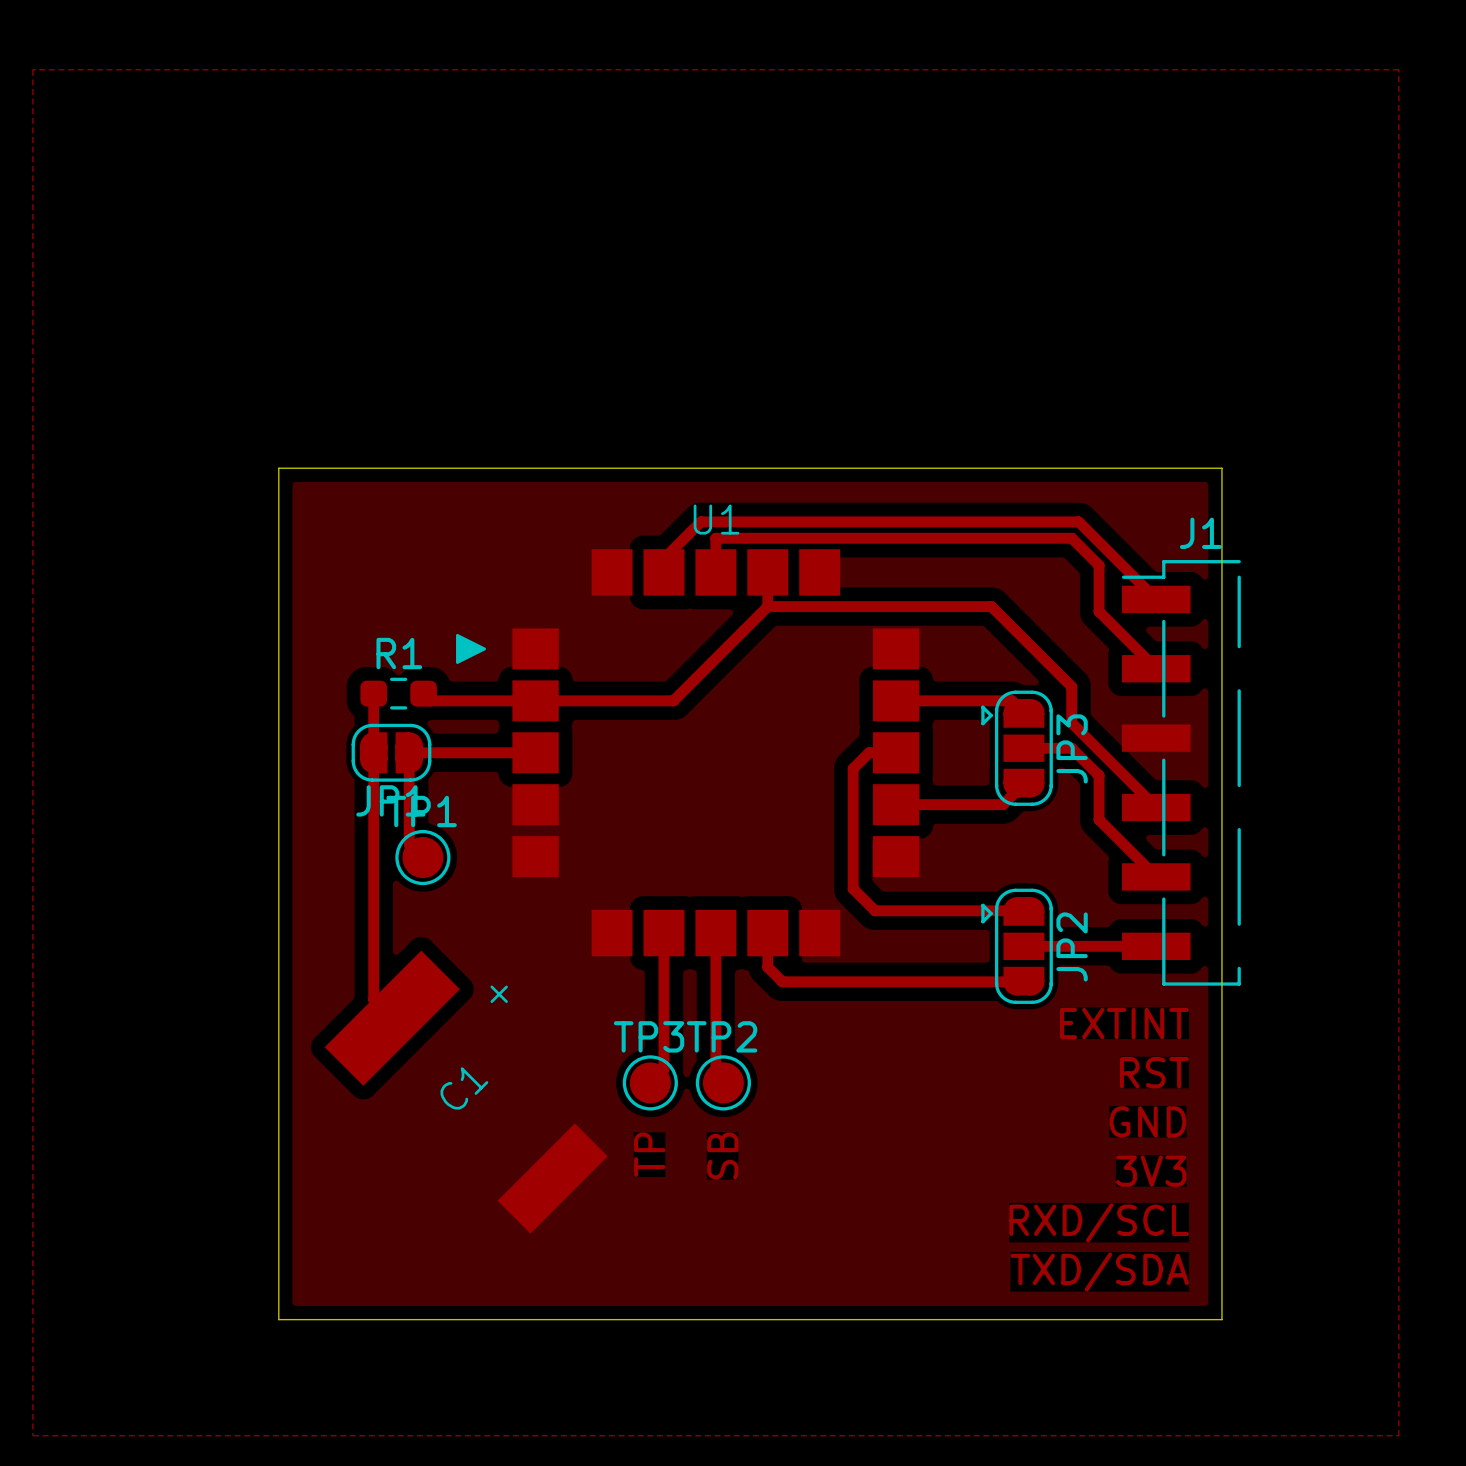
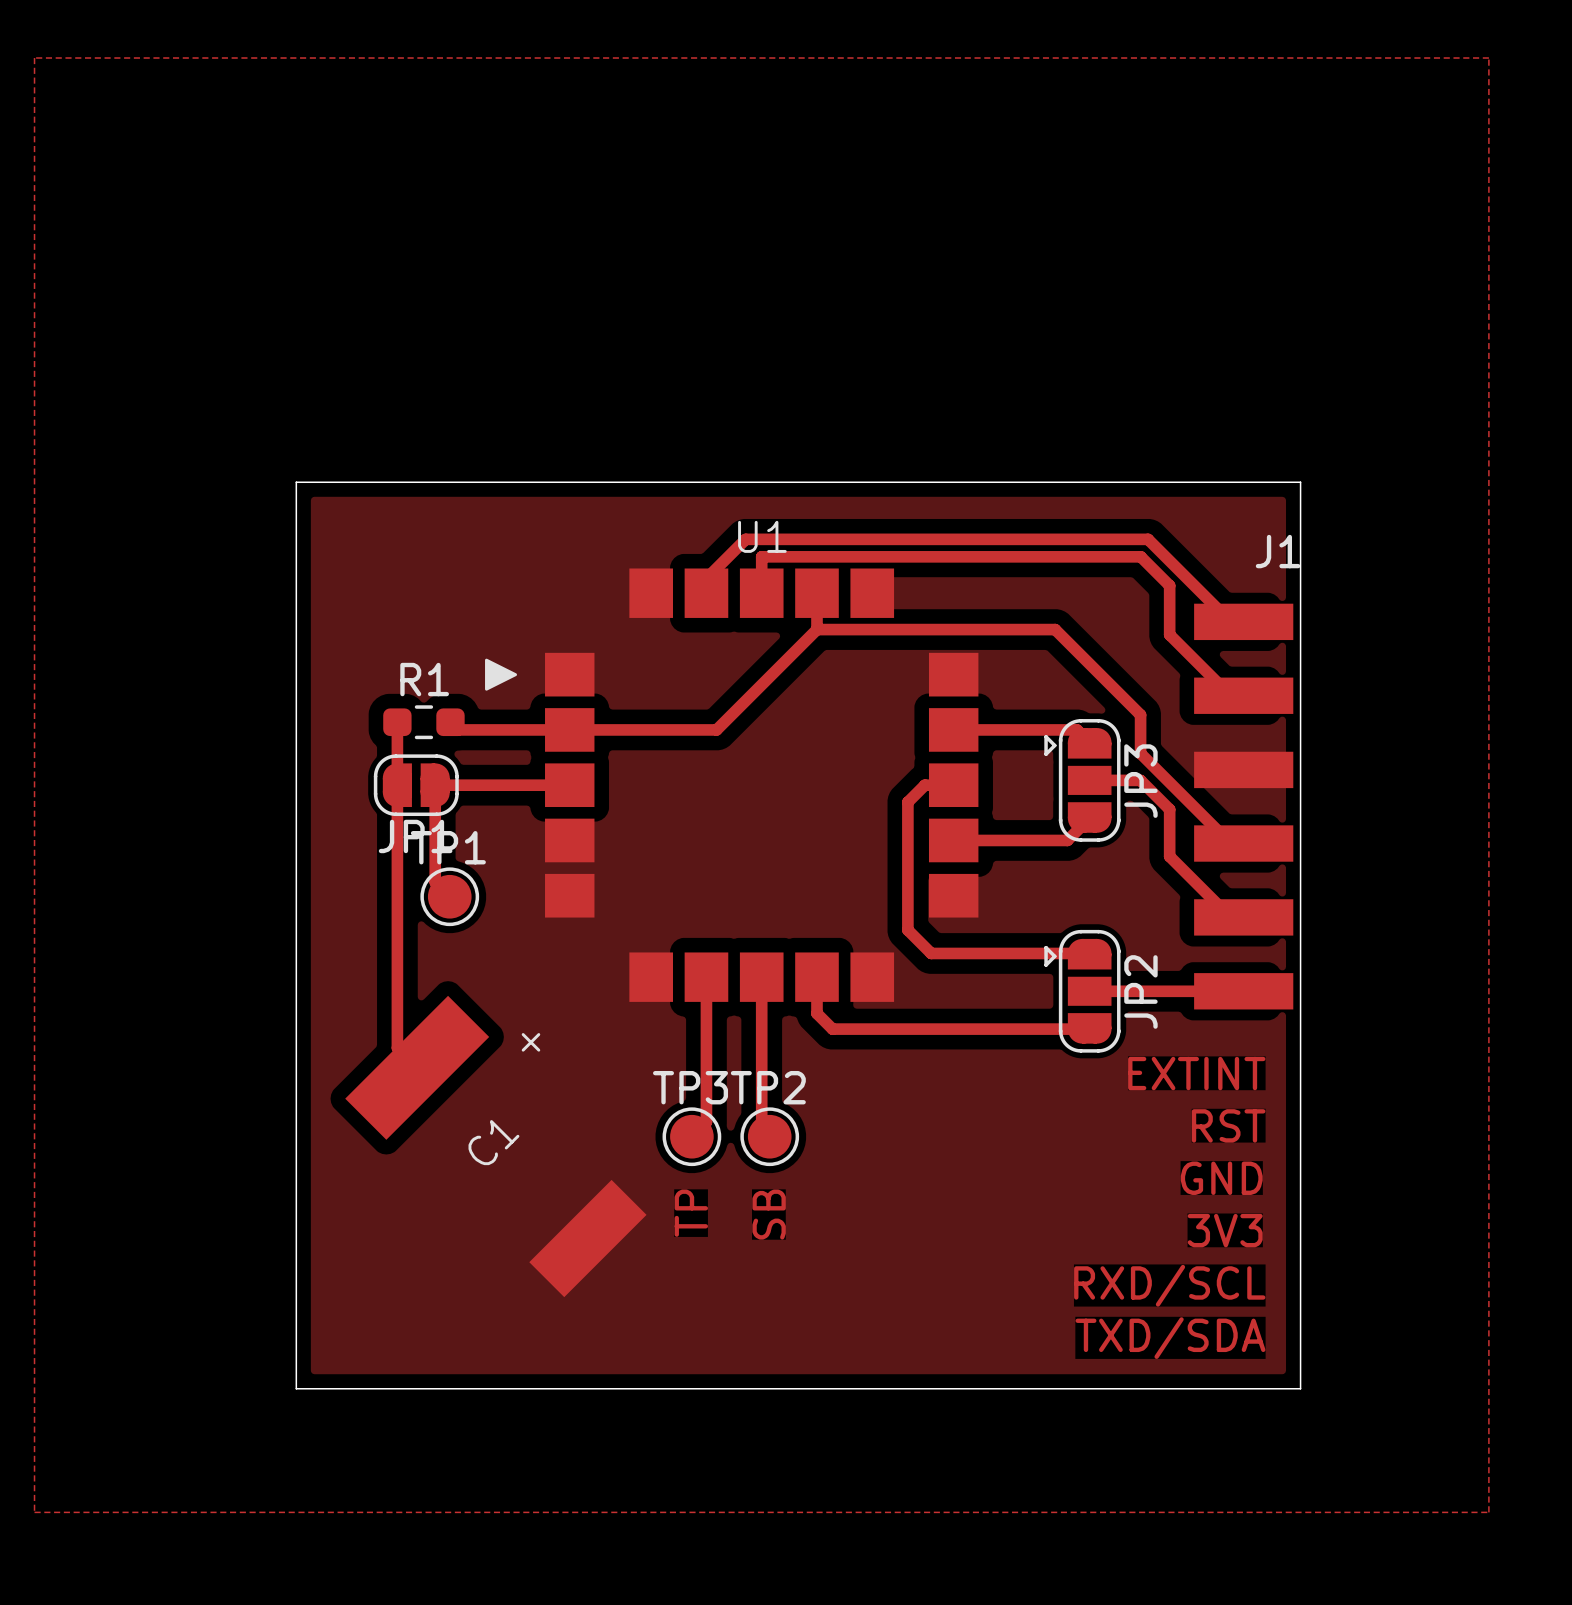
J1 footprint: [1121, 560, 1241, 986] -> [1194, 603, 1294, 1010]

